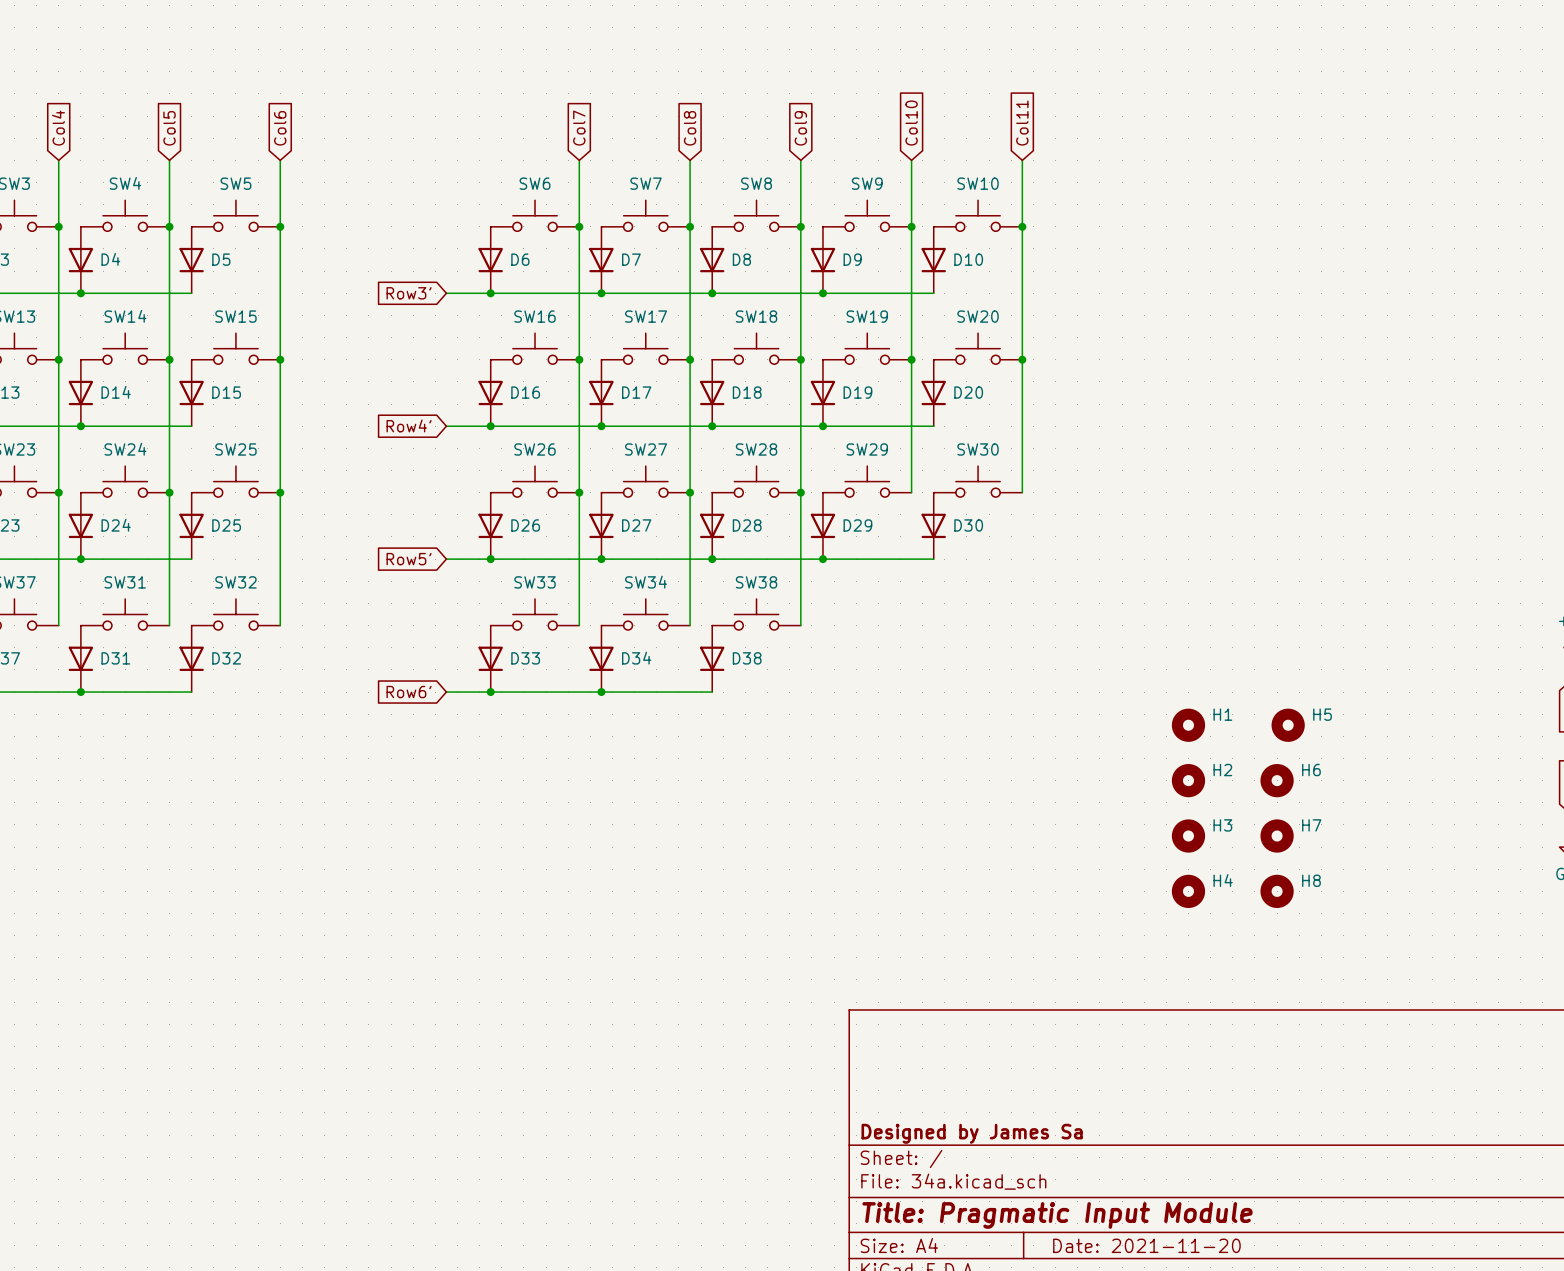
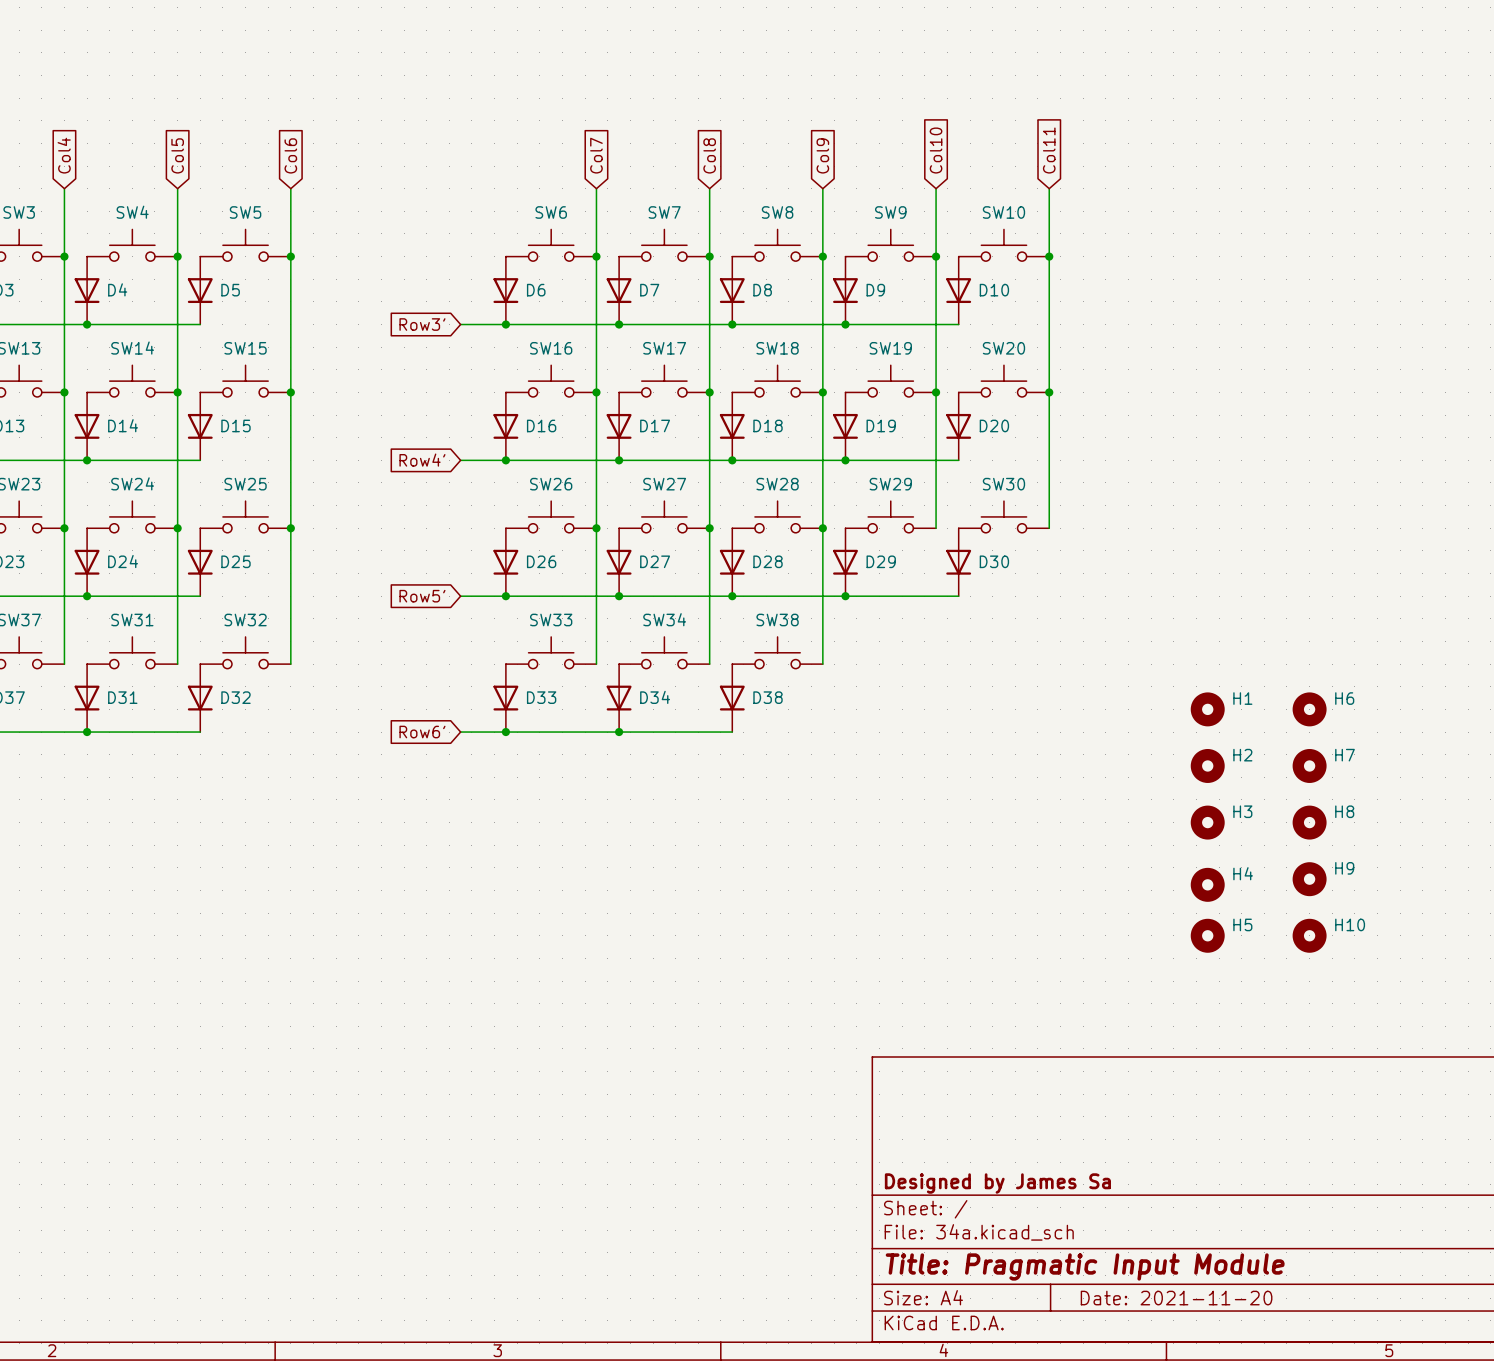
H6: none -> (1309, 709)
H1 position: (1188, 725) -> (1207, 709)
H7: none -> (1309, 765)
H5 position: (1288, 725) -> (1207, 935)
H6 name: H6 (1311, 770) -> H8 (1344, 811)
H2 position: (1188, 780) -> (1207, 765)
H7 name: H7 (1311, 825) -> H9 (1344, 868)
H3 position: (1188, 836) -> (1207, 822)
H8 name: H8 (1311, 880) -> H10 (1350, 924)
H4 position: (1188, 891) -> (1207, 884)

